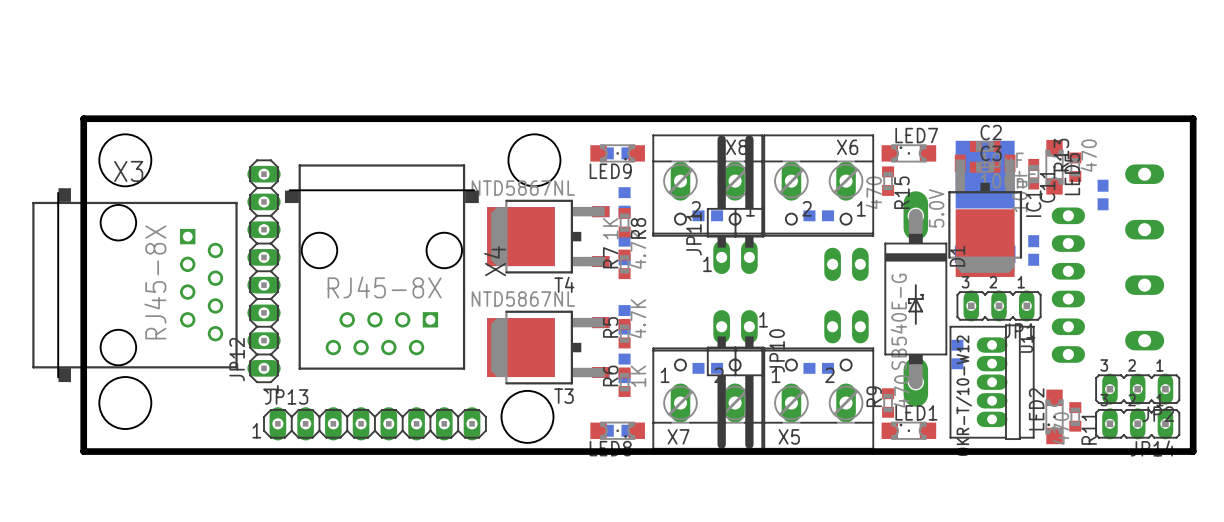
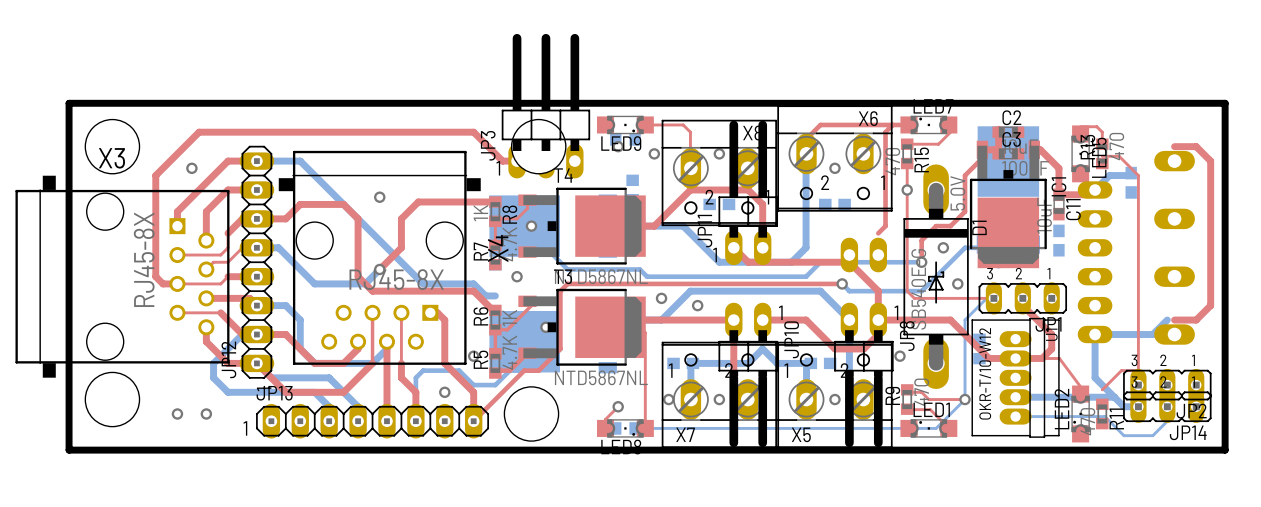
JP3: none -> (545, 106)
top track: none -> (645, 124) (683, 124) (690, 132) (690, 161)
top track: none -> (892, 124) (885, 132) (885, 226) (878, 233)
top track: none -> (948, 124) (950, 132) (938, 144) (907, 144)
top track: none -> (907, 126) (908, 124) (820, 124) (806, 138) (806, 153)
top track: none -> (1080, 126) (1096, 126) (1102, 132) (1102, 136)
top track: none -> (998, 129) (998, 153) (994, 149) (982, 149) (982, 158) (965, 175) (965, 211) (950, 226) (936, 226) (921, 240) (921, 262)
LED9 position: (617, 153) -> (625, 124)
LED7 position: (908, 153) -> (928, 124)
via: none -> (618, 146)
top track: none -> (1174, 146) (1196, 146) (1210, 161) (1210, 305) (1196, 320) (1174, 320)
top track: none -> (1034, 149) (1040, 149) (1058, 168) (1058, 194) (1090, 194) (1095, 190) (1080, 175) (1080, 166)
X4 footprint: [284, 164, 479, 370] -> [278, 150, 481, 365]
via: none -> (654, 153)
via: none -> (719, 153)
bottom track: none -> (806, 153) (806, 247) (791, 262) (719, 262) (683, 226) (610, 226)
top track: none -> (1102, 156) (1119, 156) (1138, 175) (1138, 370) (1121, 370) (1102, 389)
top track: none -> (256, 161) (228, 161) (177, 211) (177, 226)
bottom track: none -> (256, 161) (300, 161) (423, 283) (473, 283) (485, 295) (495, 295)
top track: none -> (517, 161) (502, 161) (473, 132) (199, 132) (155, 175) (155, 276) (163, 283) (220, 283) (228, 276) (256, 276)
C11 position: (1033, 174) -> (1058, 204)
top track: none -> (907, 163) (907, 291) (914, 298) (993, 298)
via: none -> (191, 168)
via: none -> (834, 168)
R15 position: (888, 181) -> (907, 153)
X6 position: (818, 185) -> (834, 158)
X3 footprint: [32, 188, 238, 383] -> [15, 175, 230, 378]
bottom track: none -> (1129, 175) (1131, 173) (1128, 175) (1109, 175) (1095, 190)
top track: none -> (256, 190) (228, 190) (206, 211) (206, 240)
via: none -> (907, 190)
via: none -> (379, 197)
top track: none -> (527, 200) (527, 208) (517, 218) (497, 218) (495, 221) (495, 245)
top track: none -> (495, 202) (418, 202) (401, 218) (401, 247) (379, 269)
R8 position: (624, 222) -> (495, 211)
via: none -> (531, 226)
T4 rotation: 0° (548, 236) -> 180° (582, 226)
top track: none -> (610, 226) (654, 226) (690, 190) (748, 190) (762, 204) (762, 233)
top track: none -> (733, 233) (733, 247) (748, 262) (849, 262) (878, 291) (878, 334) (863, 348) (834, 348) (806, 320) (762, 320)
part position: (1068, 243) -> (1095, 218)
part: (624, 250) -> none
bottom track: none -> (982, 244) (979, 247) (965, 247) (921, 291) (849, 291) (842, 283)
top track: none -> (256, 247) (242, 247) (228, 262) (213, 262) (206, 269)
bottom track: none -> (256, 247) (278, 247) (314, 283) (365, 283) (379, 269)
bottom track: none -> (545, 247) (567, 269) (639, 269) (647, 276) (806, 276) (820, 262) (921, 262)
via: none -> (943, 247)
top track: none -> (177, 255) (220, 255) (228, 247) (228, 233) (242, 218) (285, 218) (300, 204) (343, 204) (358, 218) (358, 276) (372, 291) (473, 291) (492, 310) (495, 310)
R7 position: (624, 264) -> (495, 255)
via: none -> (921, 262)
via: none -> (379, 269)
via: none -> (517, 276)
top track: none -> (842, 283) (567, 283) (560, 291) (560, 348) (538, 370) (524, 370) (473, 421) (473, 392) (444, 363) (444, 320) (437, 312) (430, 312)
via: none -> (842, 283)
via: none -> (957, 283)
D1 position: (915, 299) -> (936, 276)
top track: none -> (206, 298) (249, 298) (256, 305)
via: none -> (661, 298)
bottom track: none -> (993, 298) (986, 298) (965, 320) (965, 399) (936, 428) (635, 428)
top track: none -> (1022, 298) (1022, 305) (1051, 334) (1051, 348) (1042, 358) (989, 358) (950, 320) (878, 320)
top track: none -> (527, 301) (531, 305) (507, 329) (495, 329) (495, 353)
bottom track: none -> (256, 305) (285, 305) (300, 320) (300, 348) (314, 363) (372, 363) (386, 348) (386, 341)
via: none -> (697, 305)
top track: none -> (177, 312) (220, 312) (242, 334) (285, 334) (314, 363) (343, 363) (358, 348) (358, 341)
top track: none -> (372, 312) (372, 363) (343, 392) (285, 392) (256, 363) (228, 363) (206, 341) (206, 327)
top track: none -> (401, 312) (401, 377) (415, 392) (415, 421)
part: (624, 319) -> none
top track: none -> (632, 320) (645, 332) (645, 428)
JP8 side: bottom (846, 326) -> top (863, 374)
part position: (1068, 326) -> (1095, 305)
bottom track: none -> (1167, 320) (1152, 334) (1095, 334) (1095, 377) (1123, 406) (1138, 406)
via: none -> (545, 327)
top track: none -> (610, 327) (617, 320) (733, 320) (733, 385) (747, 399)
bottom track: none -> (610, 327) (617, 320) (661, 320) (690, 291) (820, 291) (849, 320) (849, 385)
R5 position: (624, 333) -> (495, 363)
bottom track: none -> (256, 334) (242, 334) (213, 363) (213, 377) (228, 392) (314, 392) (329, 406) (329, 421)
top track: none -> (386, 341) (386, 421)
T3 rotation: 0° (548, 347) -> 180° (582, 327)
bottom track: none -> (560, 348) (538, 370) (509, 370) (495, 385) (473, 385) (459, 370) (423, 370) (415, 377) (415, 421)
top track: none -> (527, 353) (509, 370) (497, 370) (495, 373)
via: none -> (473, 356)
via: none -> (899, 356)
top track: none -> (1015, 358) (1059, 358) (1080, 386)
bottom track: none -> (256, 363) (271, 377) (329, 377) (358, 406) (358, 421)
part: (624, 368) -> none
part position: (707, 368) -> (683, 363)
part position: (818, 368) -> (820, 363)
R6 position: (624, 382) -> (495, 320)
top track: none -> (907, 389) (909, 392) (921, 392) (928, 399) (965, 399)
via: none -> (444, 392)
bottom track: none -> (1015, 397) (1114, 397)
via: none -> (668, 399)
bottom track: none -> (690, 399) (690, 365) (692, 363) (748, 363) (762, 348) (777, 363) (810, 363) (806, 367) (806, 399)
via: none -> (719, 399)
via: none -> (834, 399)
via: none -> (965, 399)
top track: none -> (618, 406) (605, 419) (605, 428)
via: none -> (618, 406)
bottom track: none -> (1167, 406) (1167, 421) (1152, 435) (1123, 435) (1104, 416) (1015, 416)
top track: none -> (907, 409) (930, 409) (948, 428)
via: none -> (177, 413)
via: none -> (206, 413)
JP14 position: (1137, 423) -> (1167, 406)

